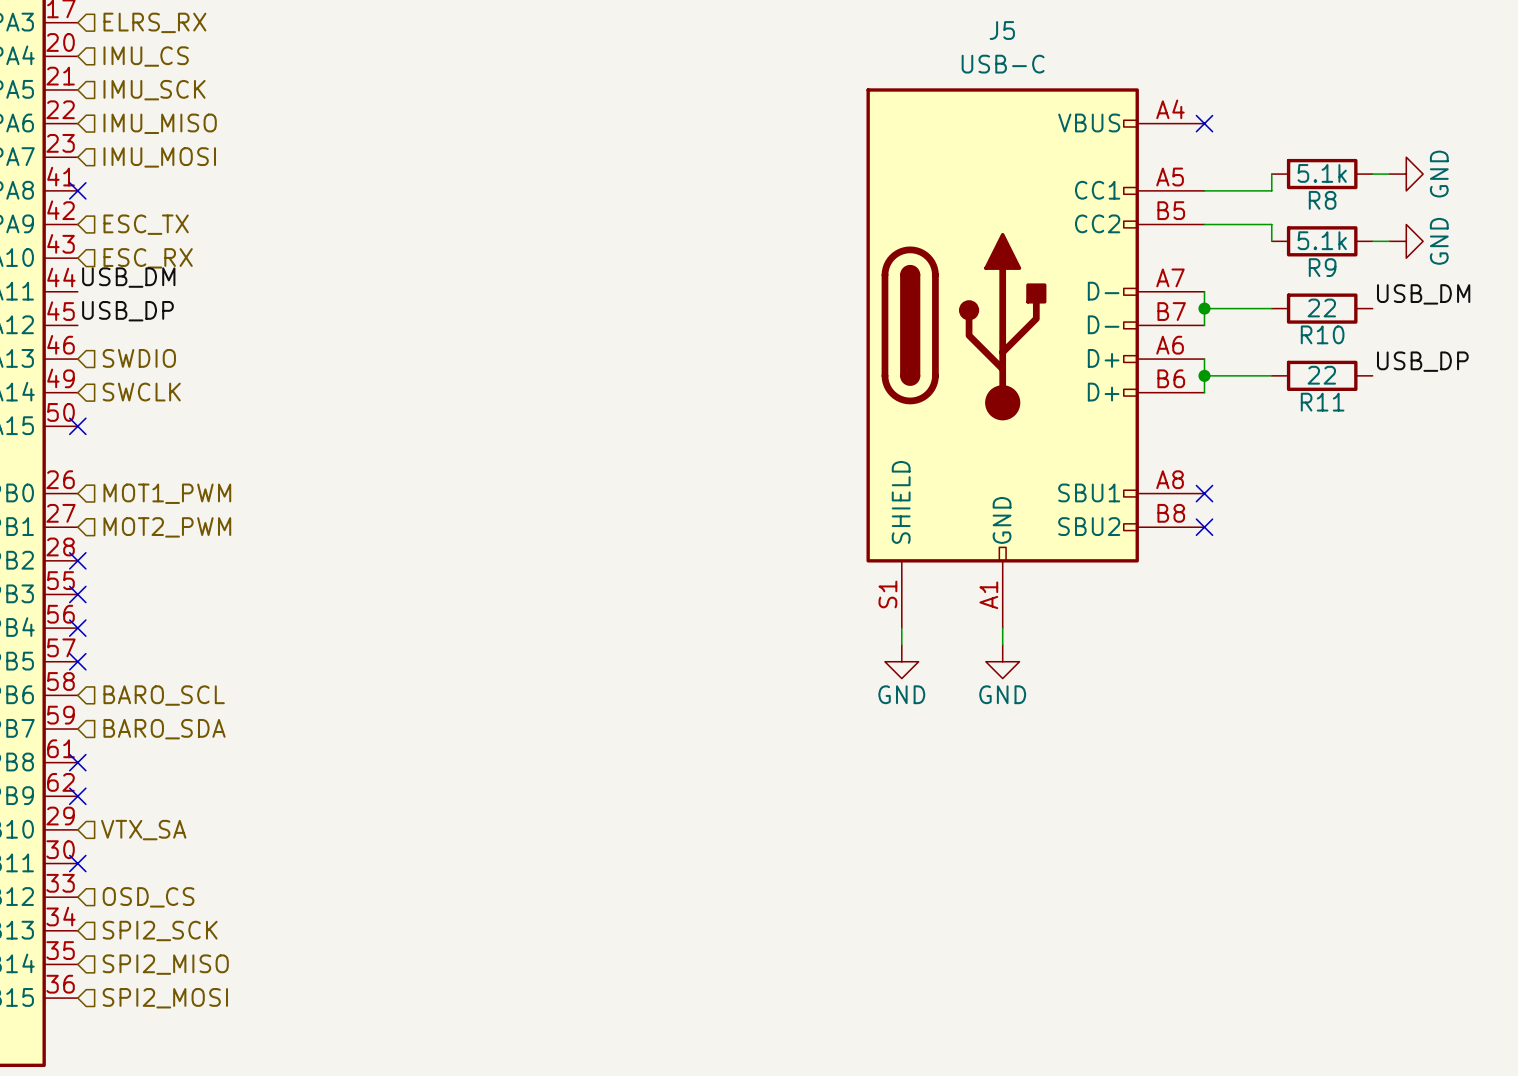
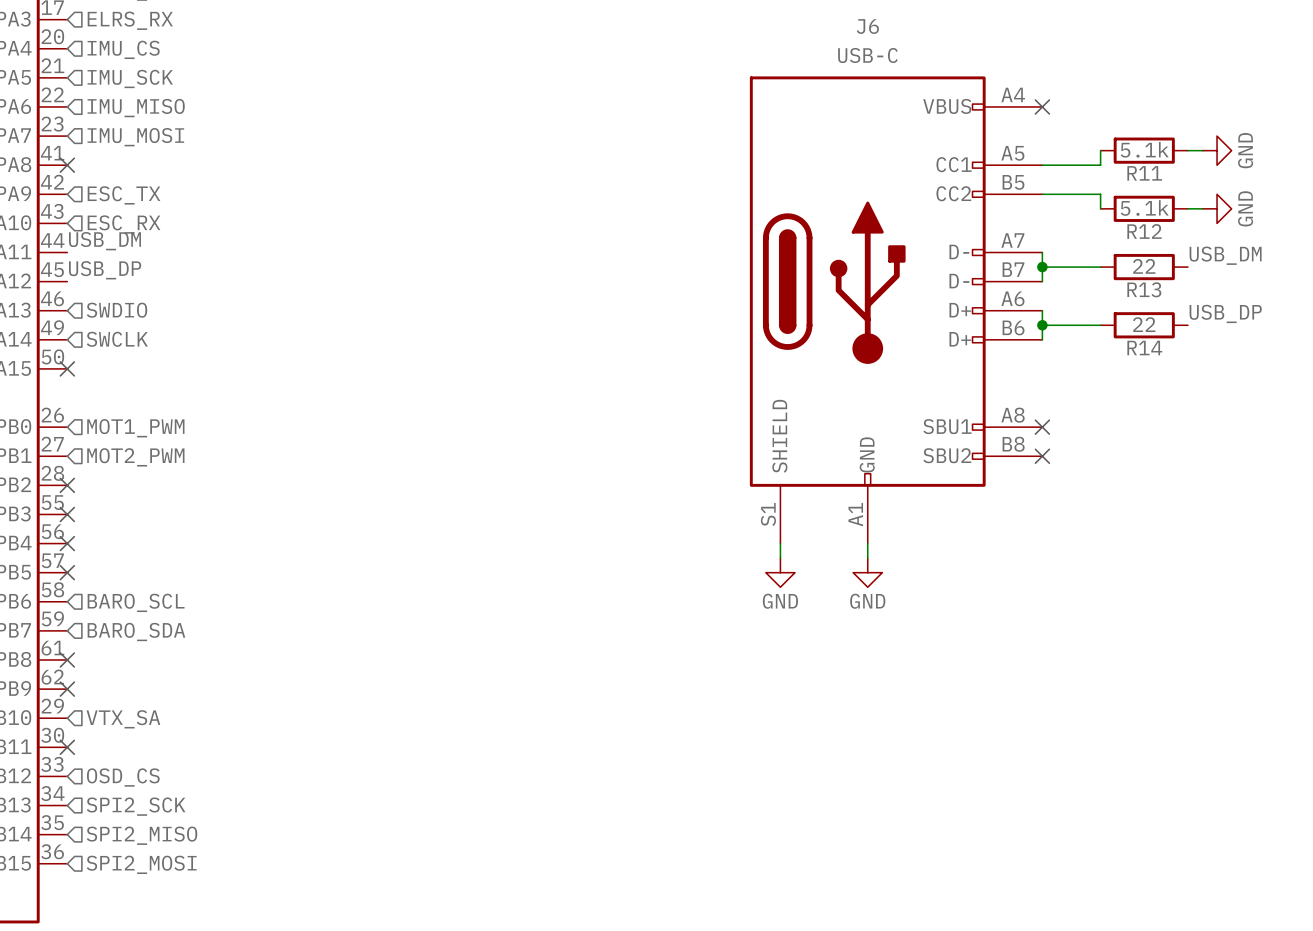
J5 name: J5 (1002, 30) -> J6 (867, 26)
R8 name: R8 (1322, 200) -> R11 (1144, 173)
R9 name: R9 (1322, 267) -> R12 (1144, 231)
R10 name: R10 (1322, 334) -> R13 (1144, 289)
R11 name: R11 (1322, 402) -> R14 (1144, 348)

